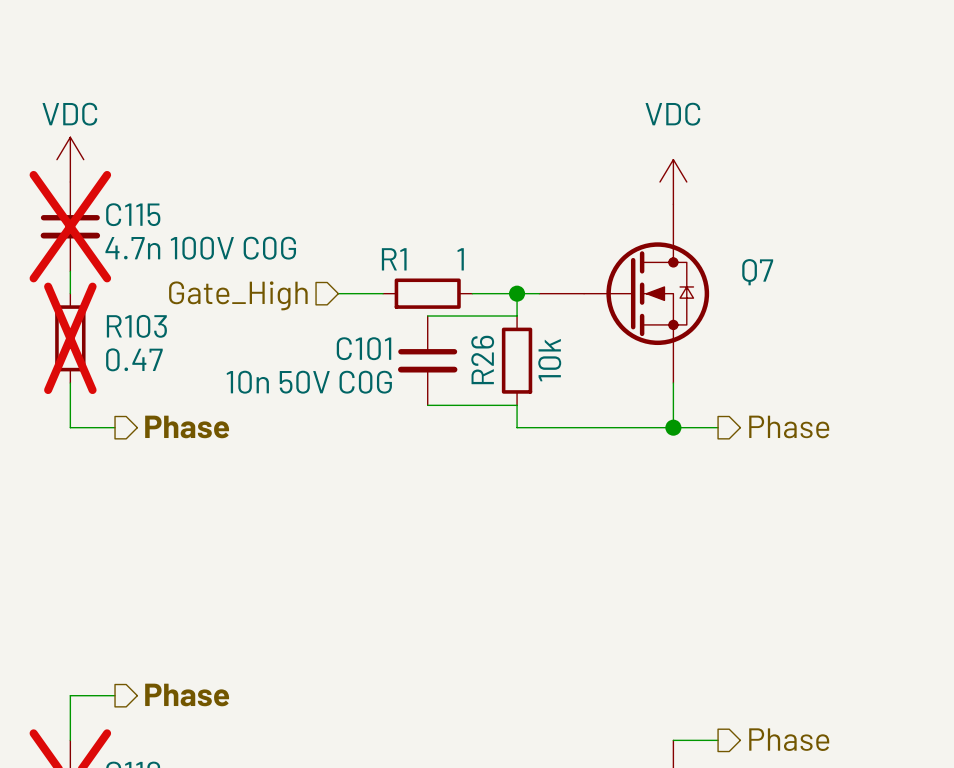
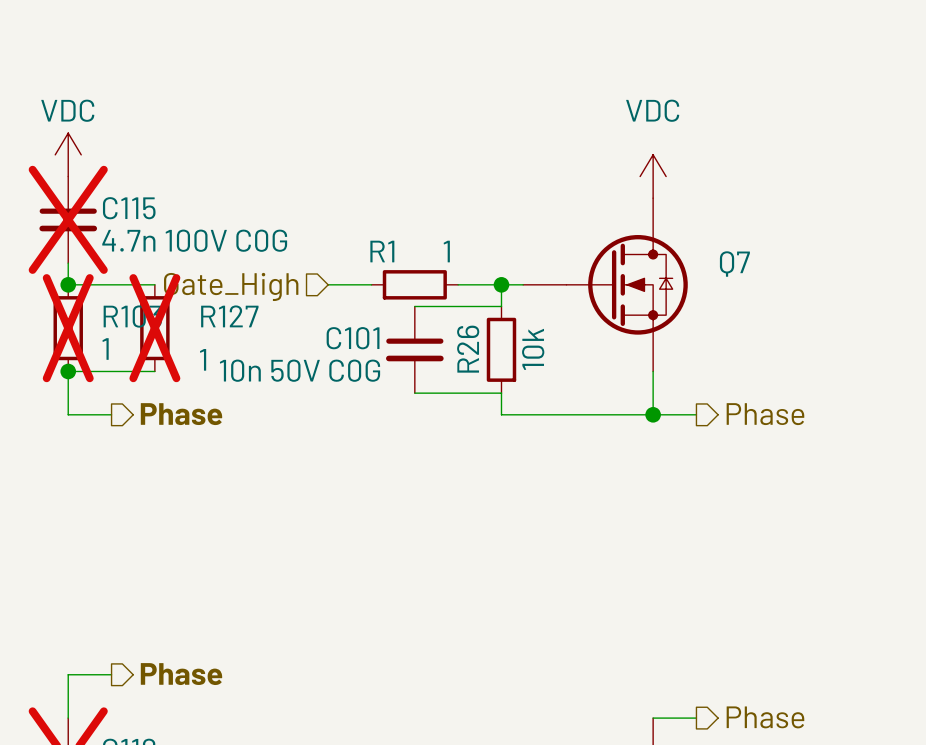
wire: none -> (68, 284) (154, 284)
junction: none -> (68, 284)
R127: none -> 1 (154, 328)
R103 value: 0.47 (134, 359) -> 1 (105, 349)
wire: none -> (68, 371) (154, 371)
junction: none -> (68, 371)

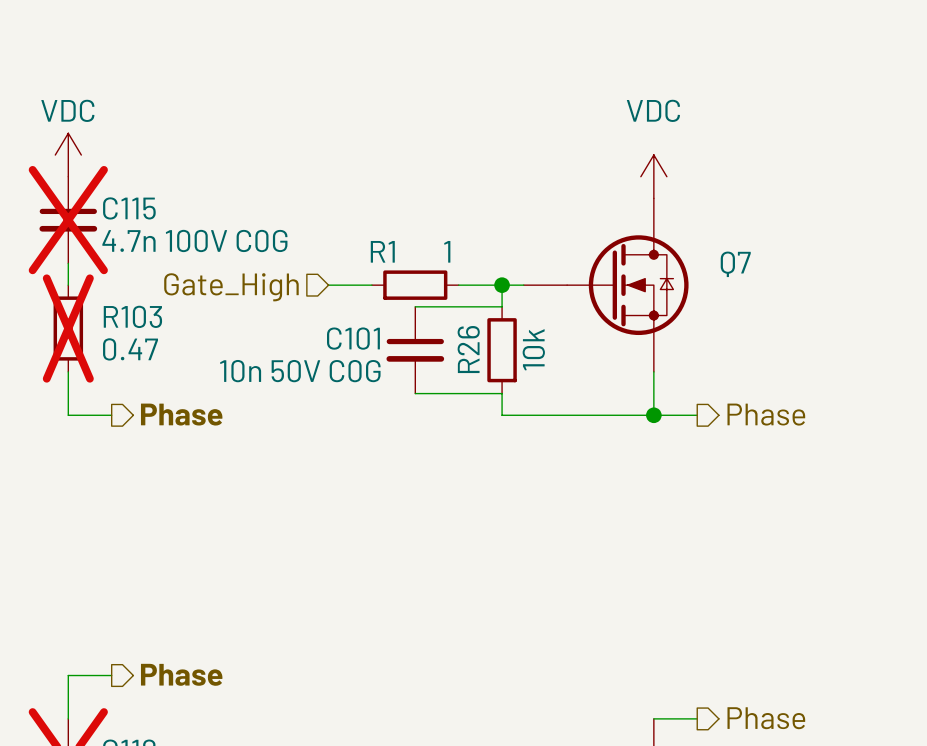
wire: (68, 284) (154, 284) -> none
junction: (68, 284) -> none
R127: 1 (154, 328) -> none
R103 value: 1 (105, 349) -> 0.47 (130, 349)
wire: (68, 371) (154, 371) -> none
junction: (68, 371) -> none

